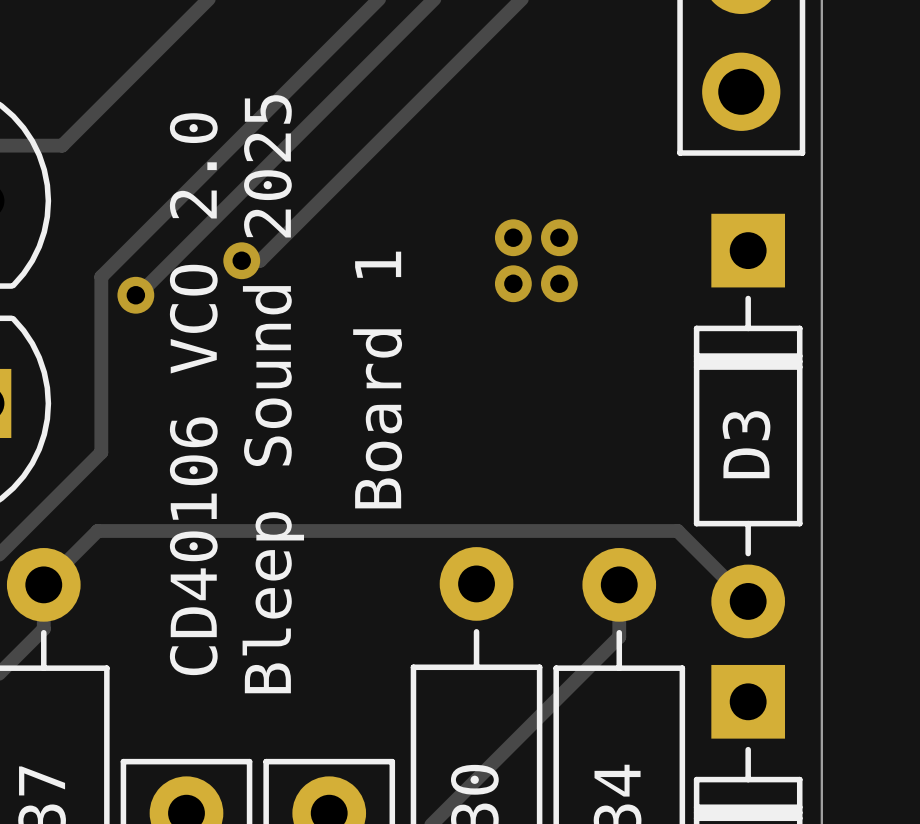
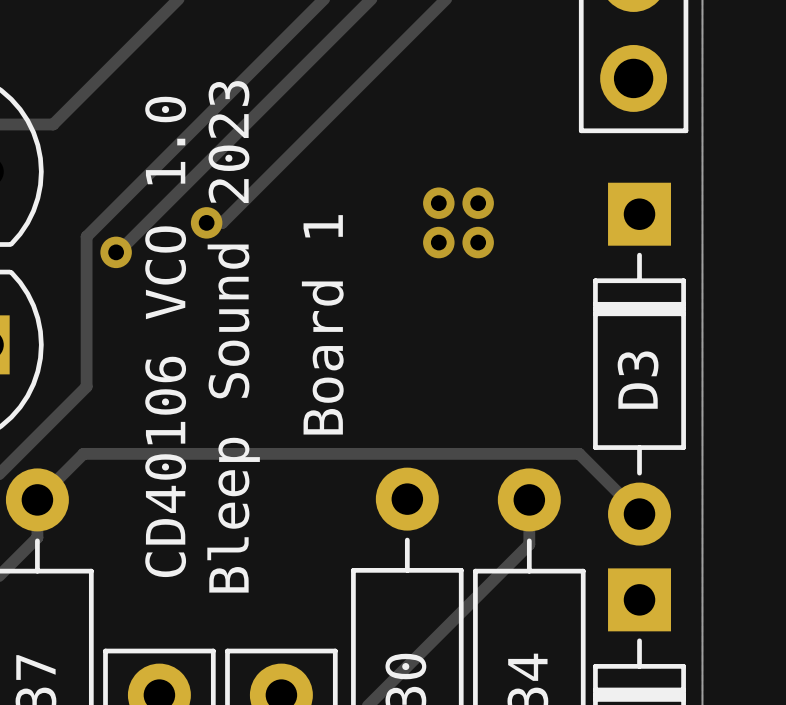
text: CD40106 VCO 2.0 (193, 394) -> CD40106 VCO 1.0 (165, 336)
text: Bleep Sound 2025 (273, 394) -> Bleep Sound 2023 (233, 336)

